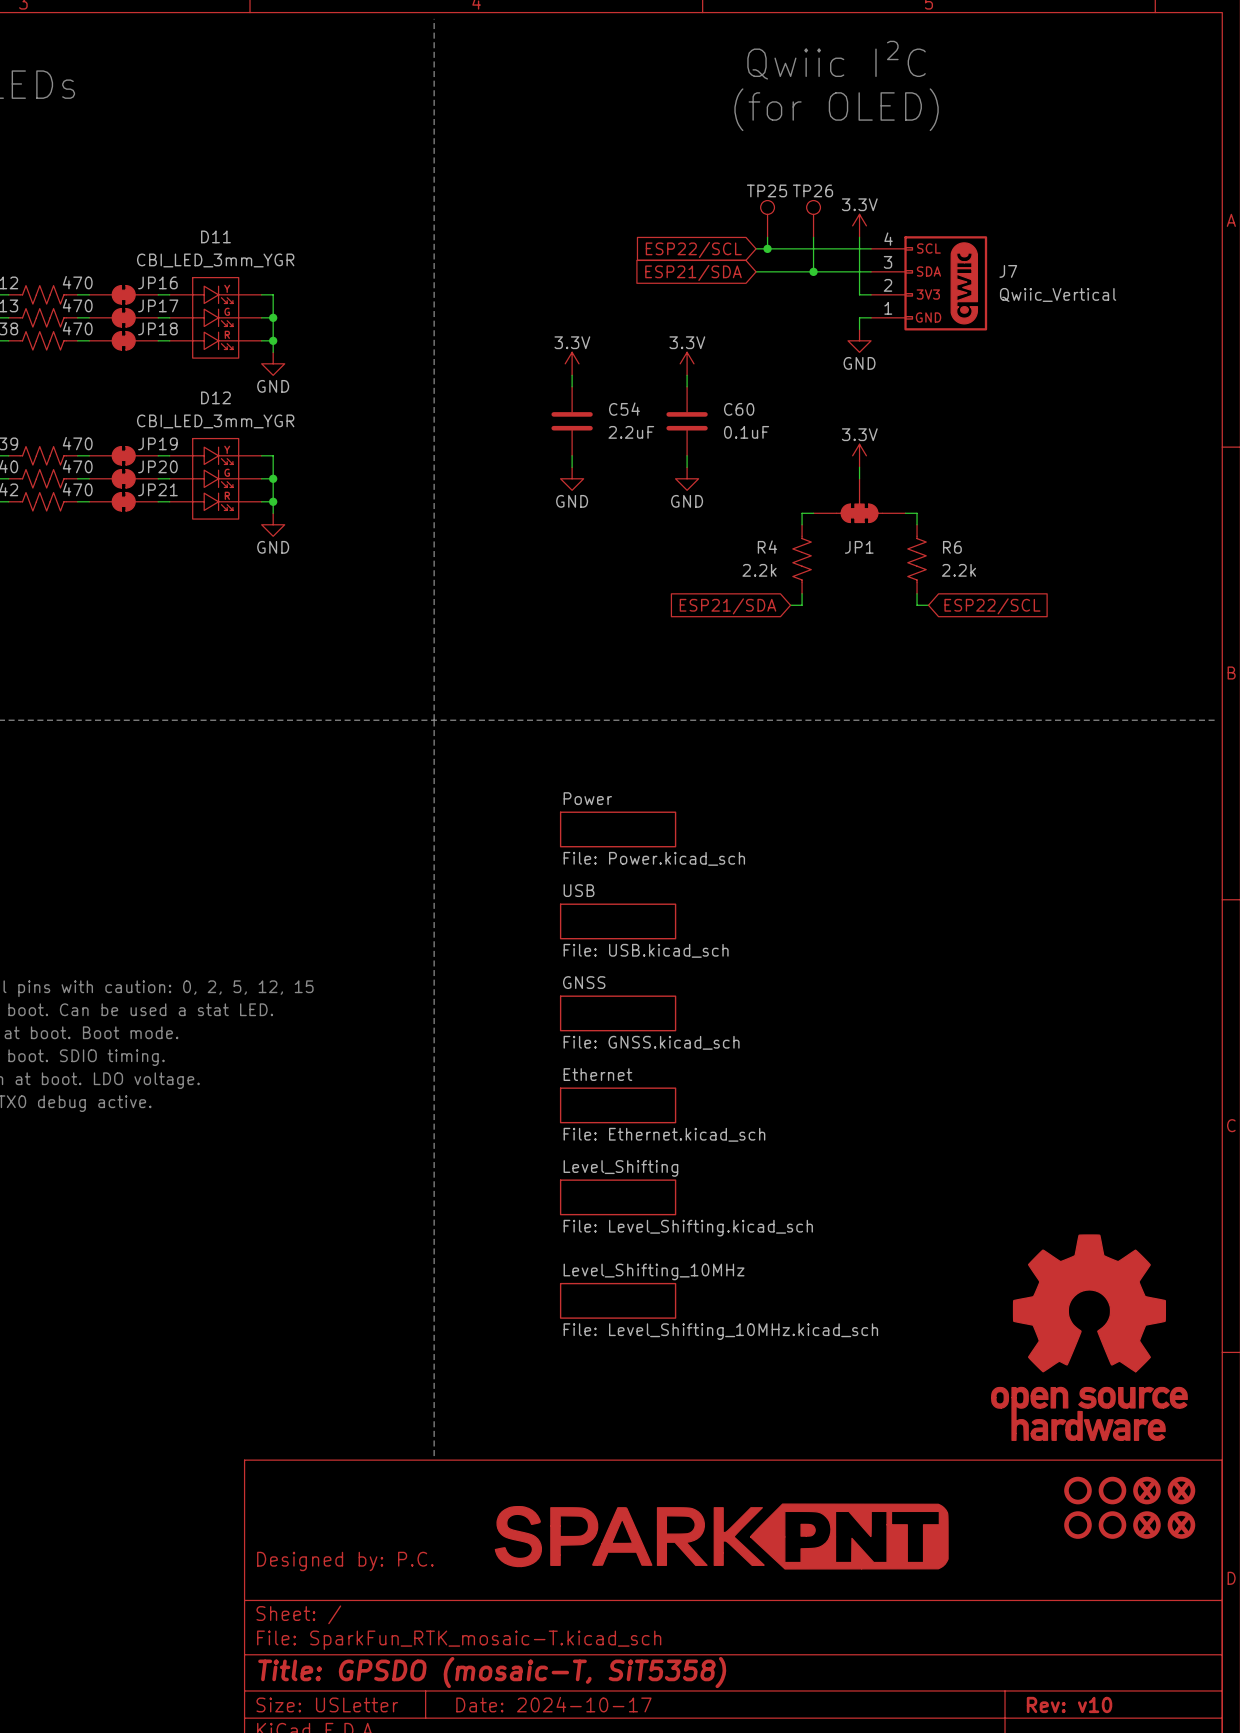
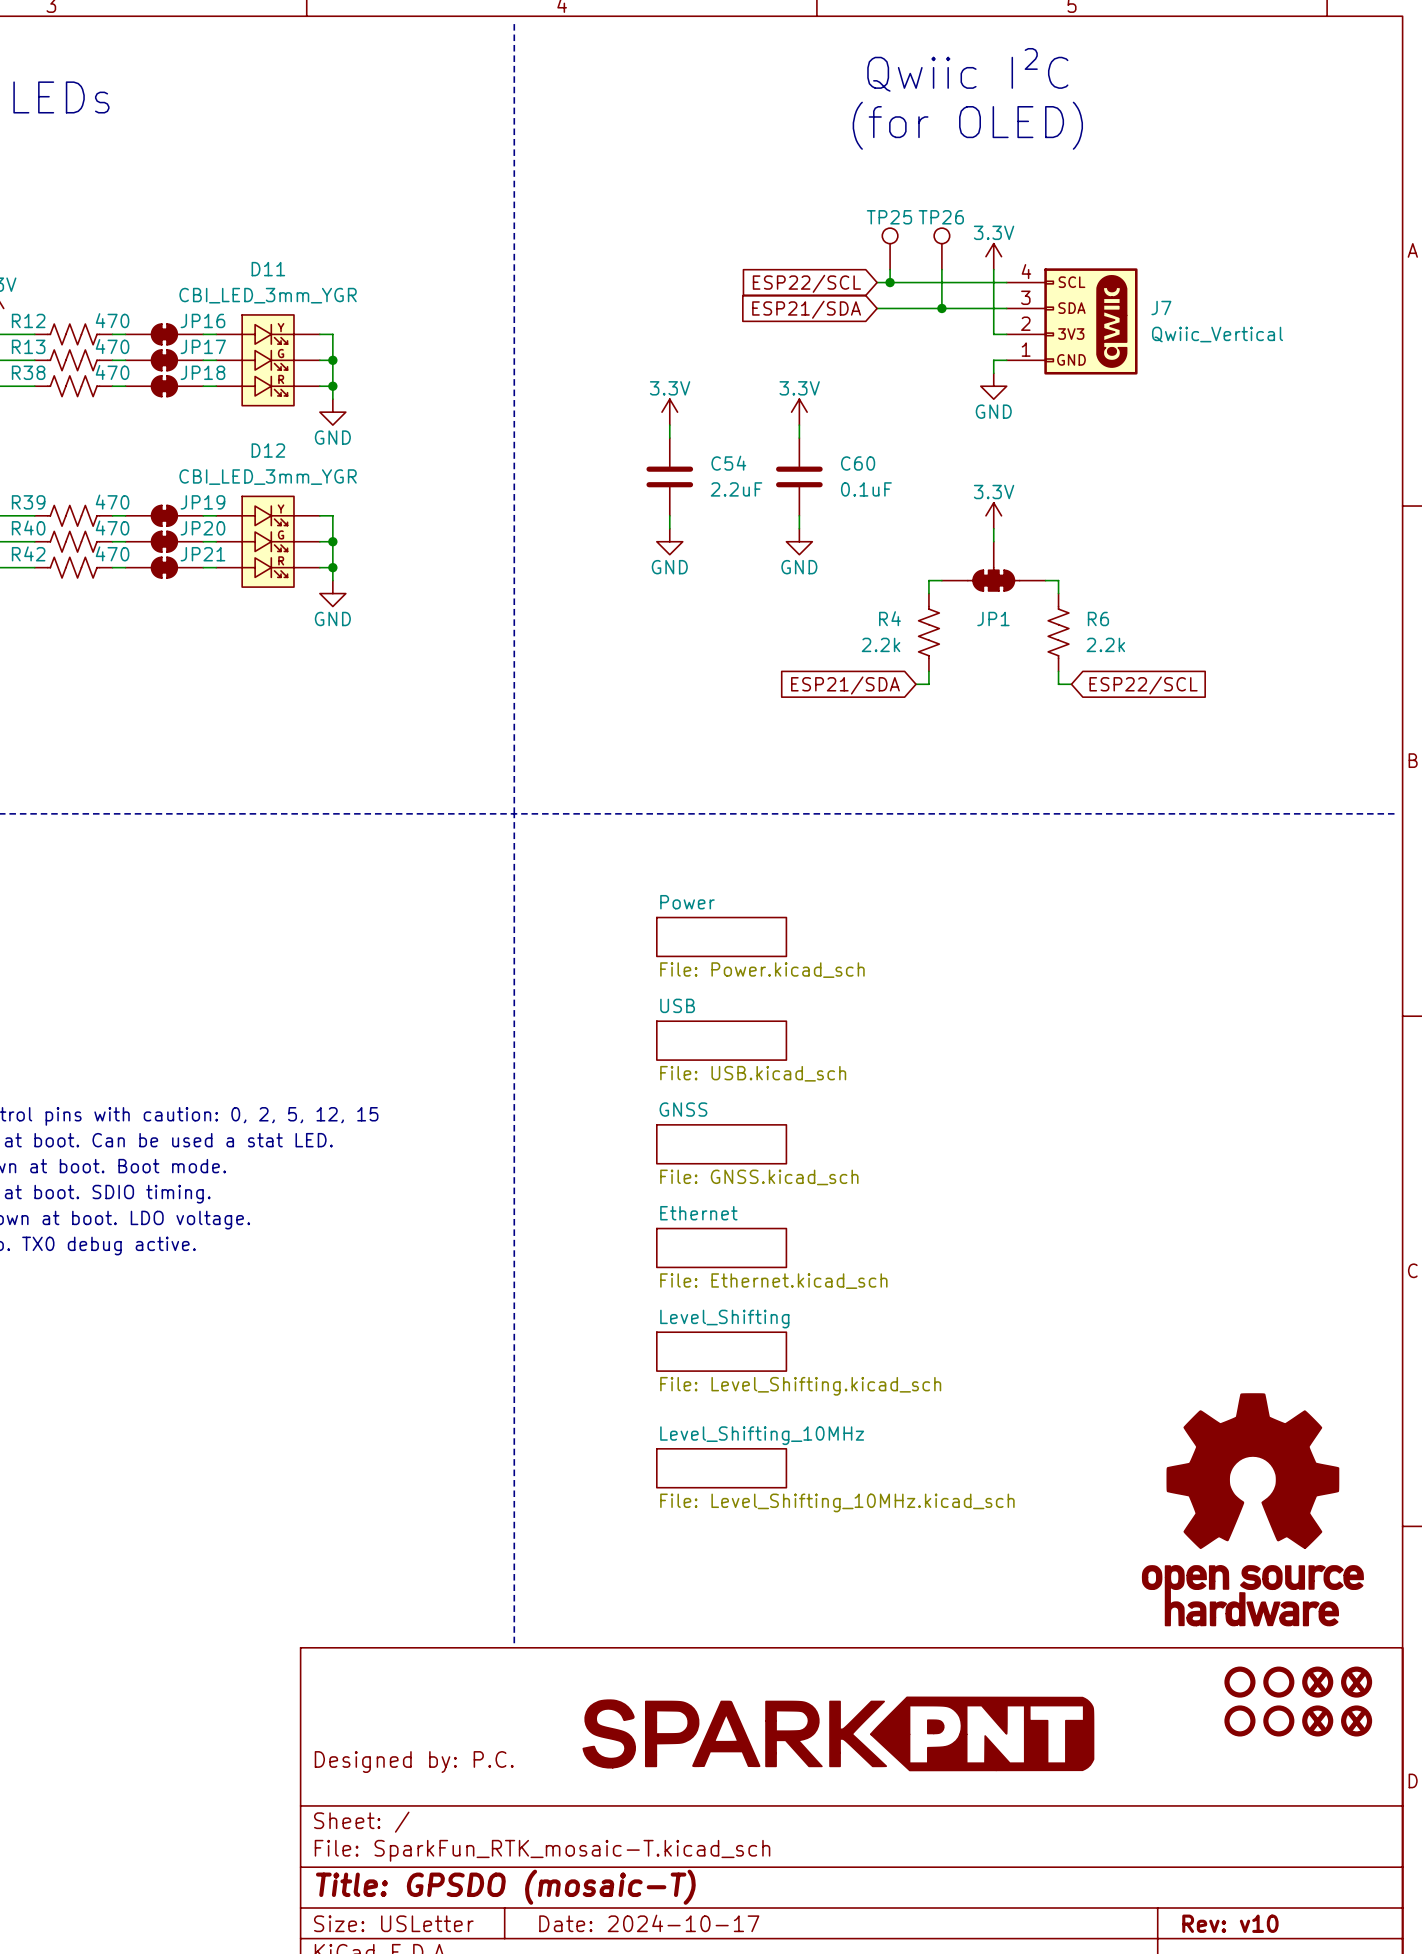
title block: Title: GPSDO (mosaic-T, SiT5358) (492, 1672) -> Title: GPSDO (mosaic-T) (505, 1887)

